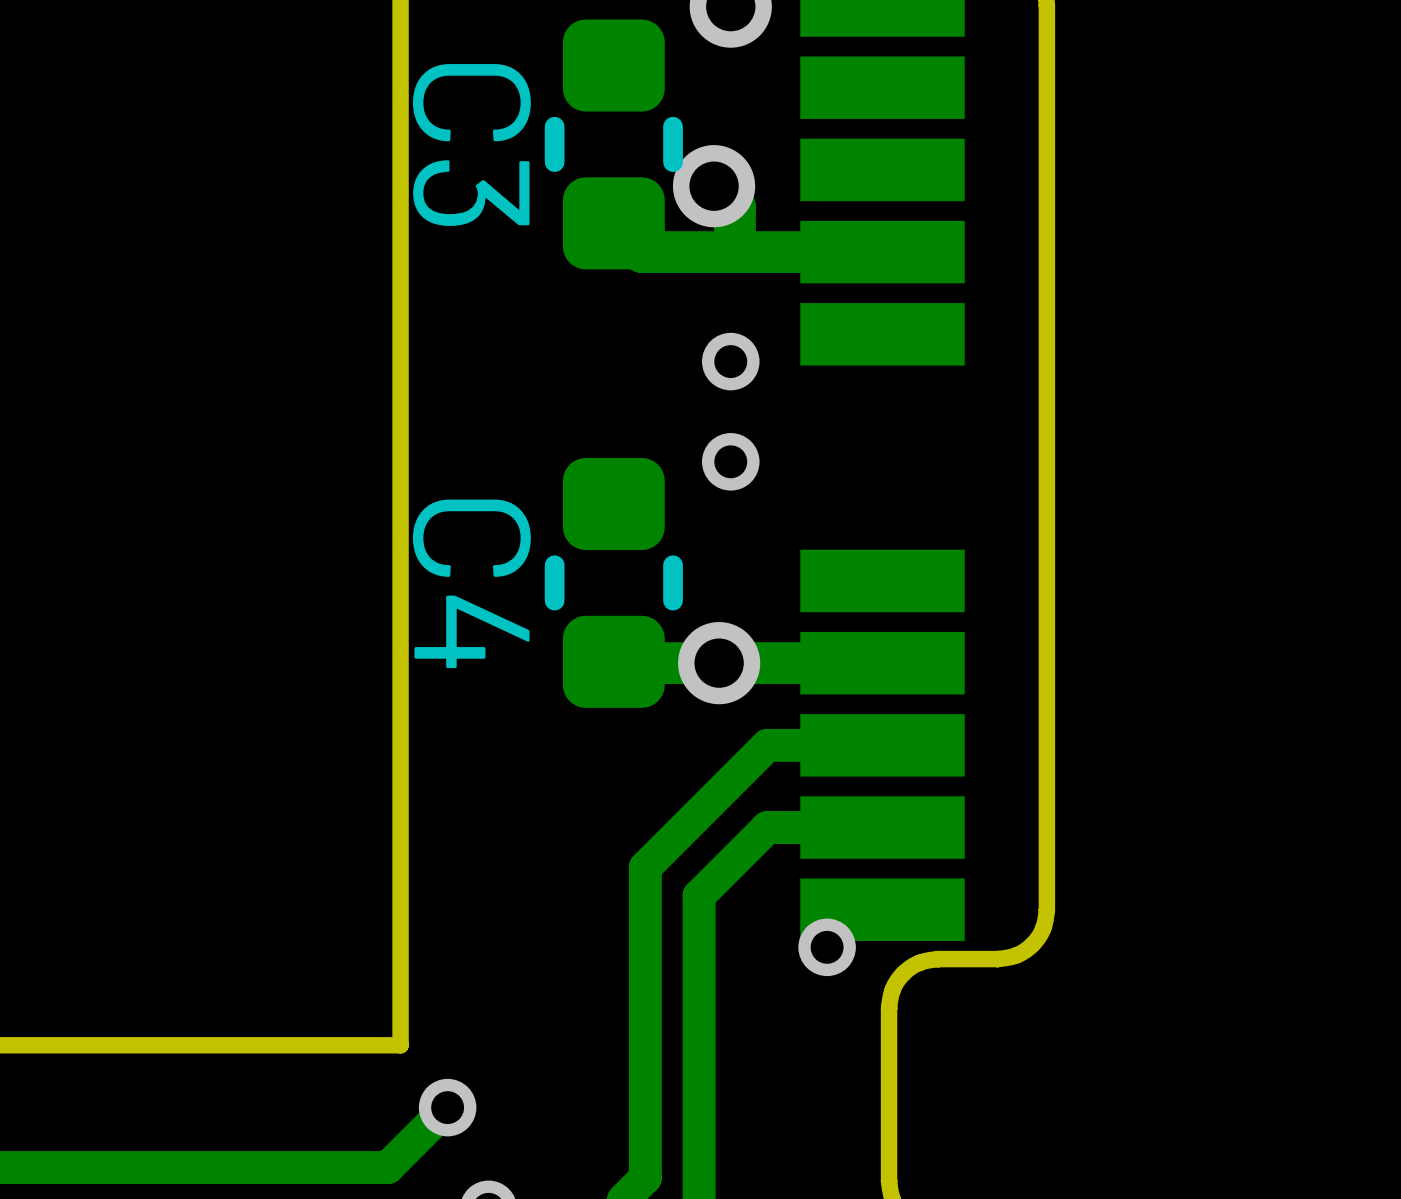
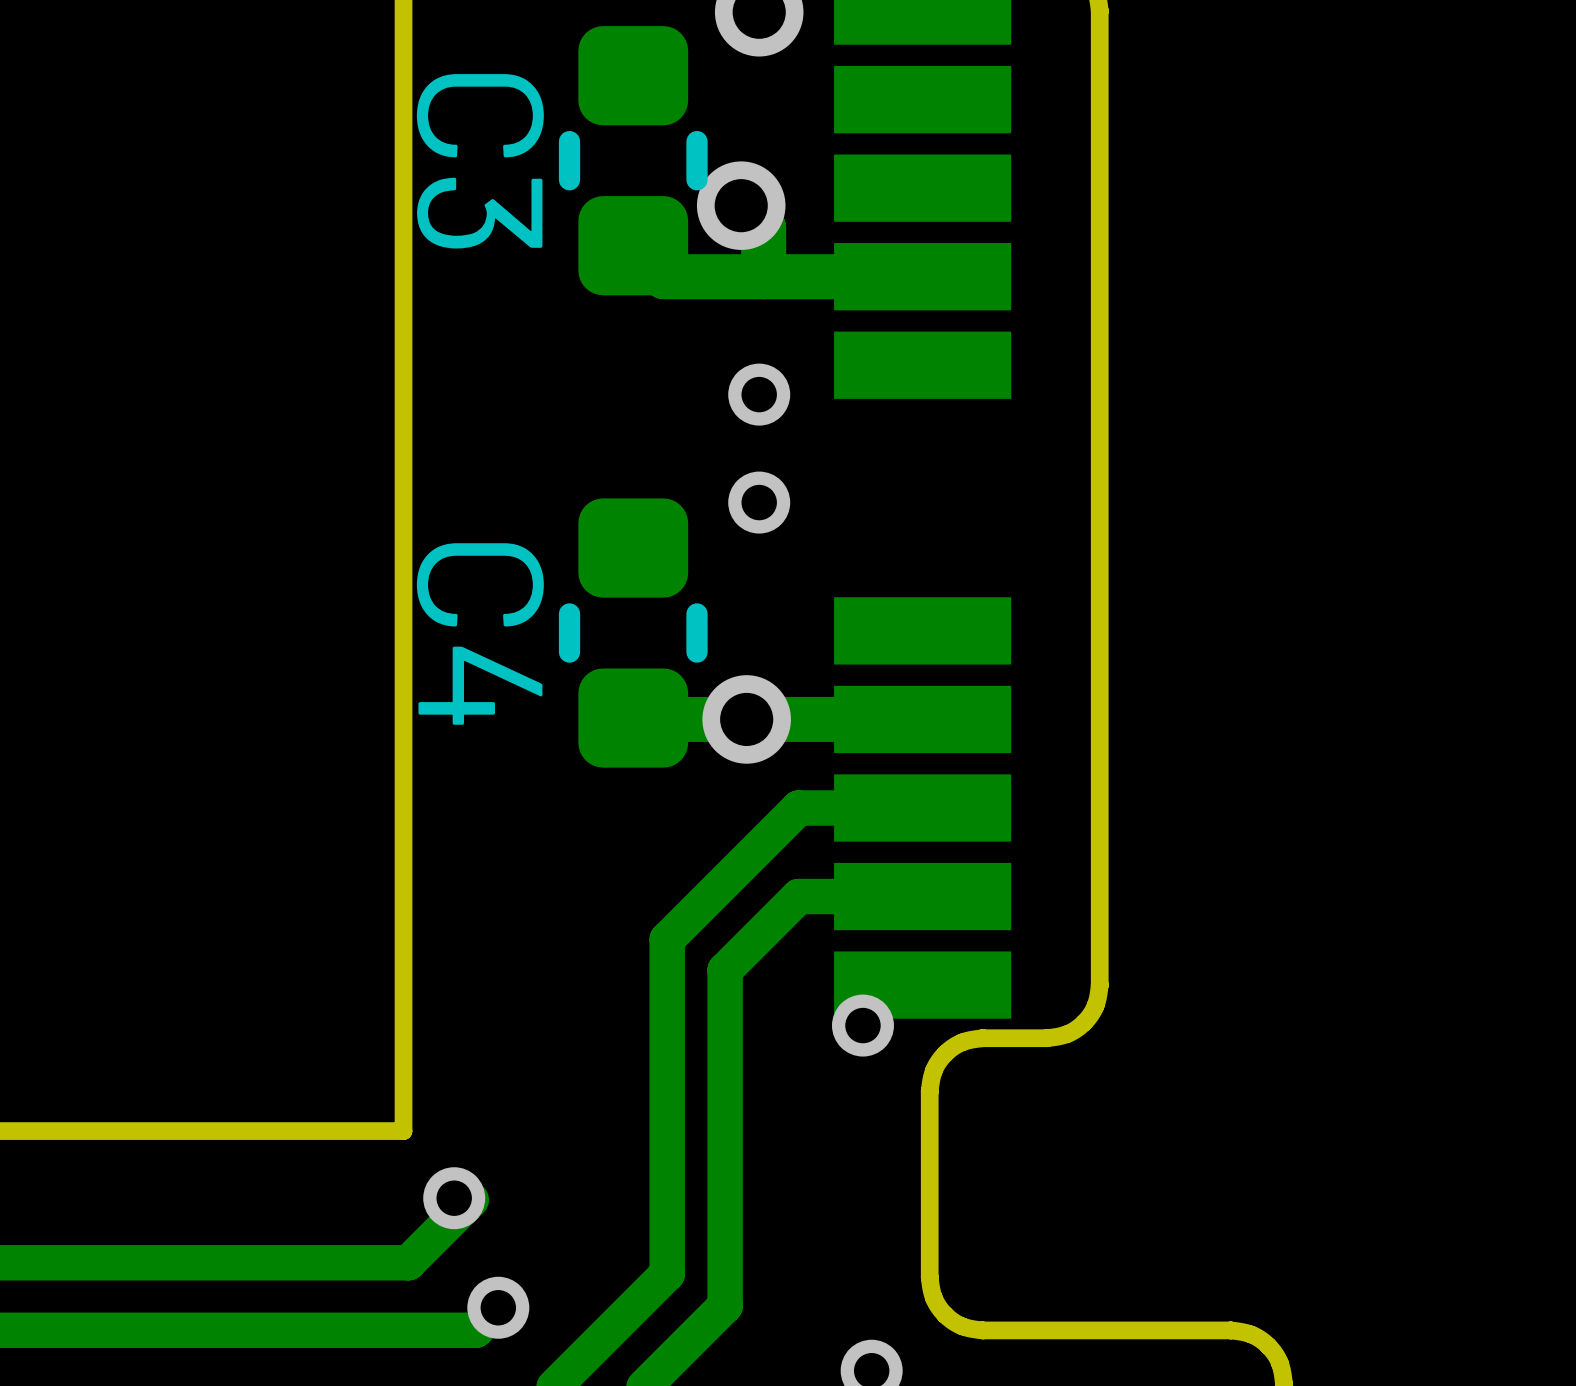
track: (447, 1107) (387, 1167) -> (471, 1199) (408, 1262) (389, 1262)

